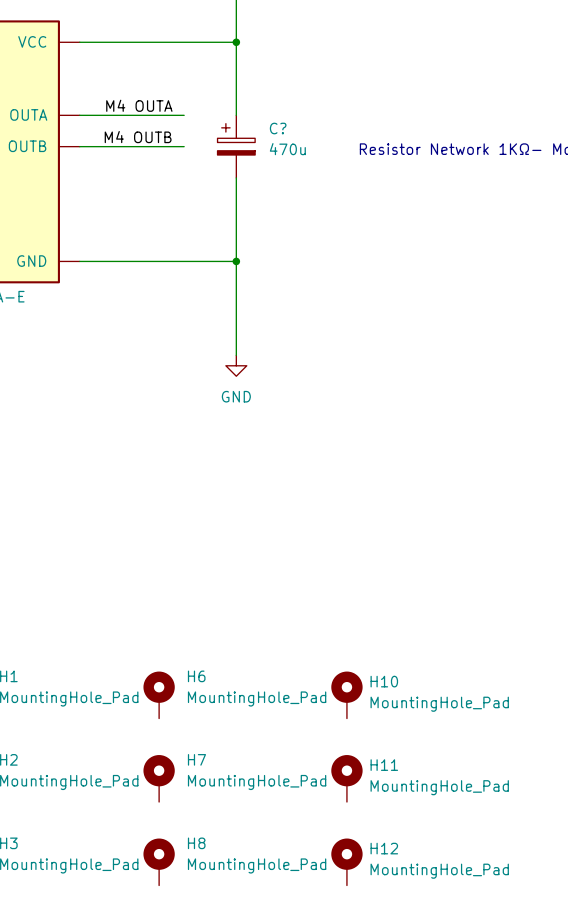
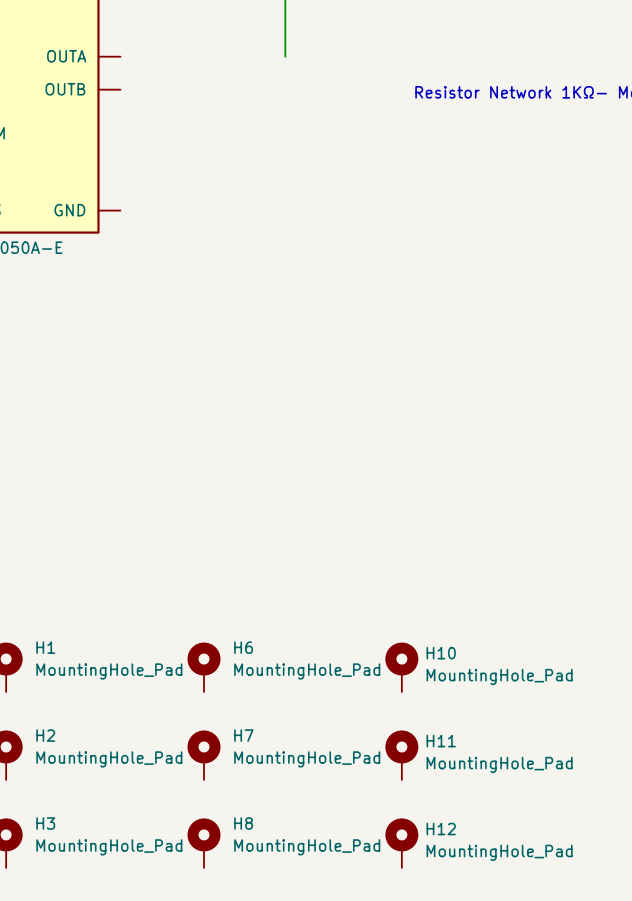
label: M4 OUTA (139, 105) -> none
wire: (79, 115) (184, 115) -> none
label: M4 OUTB (138, 137) -> none
wire: (79, 146) (184, 146) -> none
C?: 470u (236, 146) -> none
wire: (236, 177) (236, 355) -> none
wire: (79, 261) (236, 261) -> none
junction: (236, 261) -> none
power symbol: GND (236, 365) -> none

